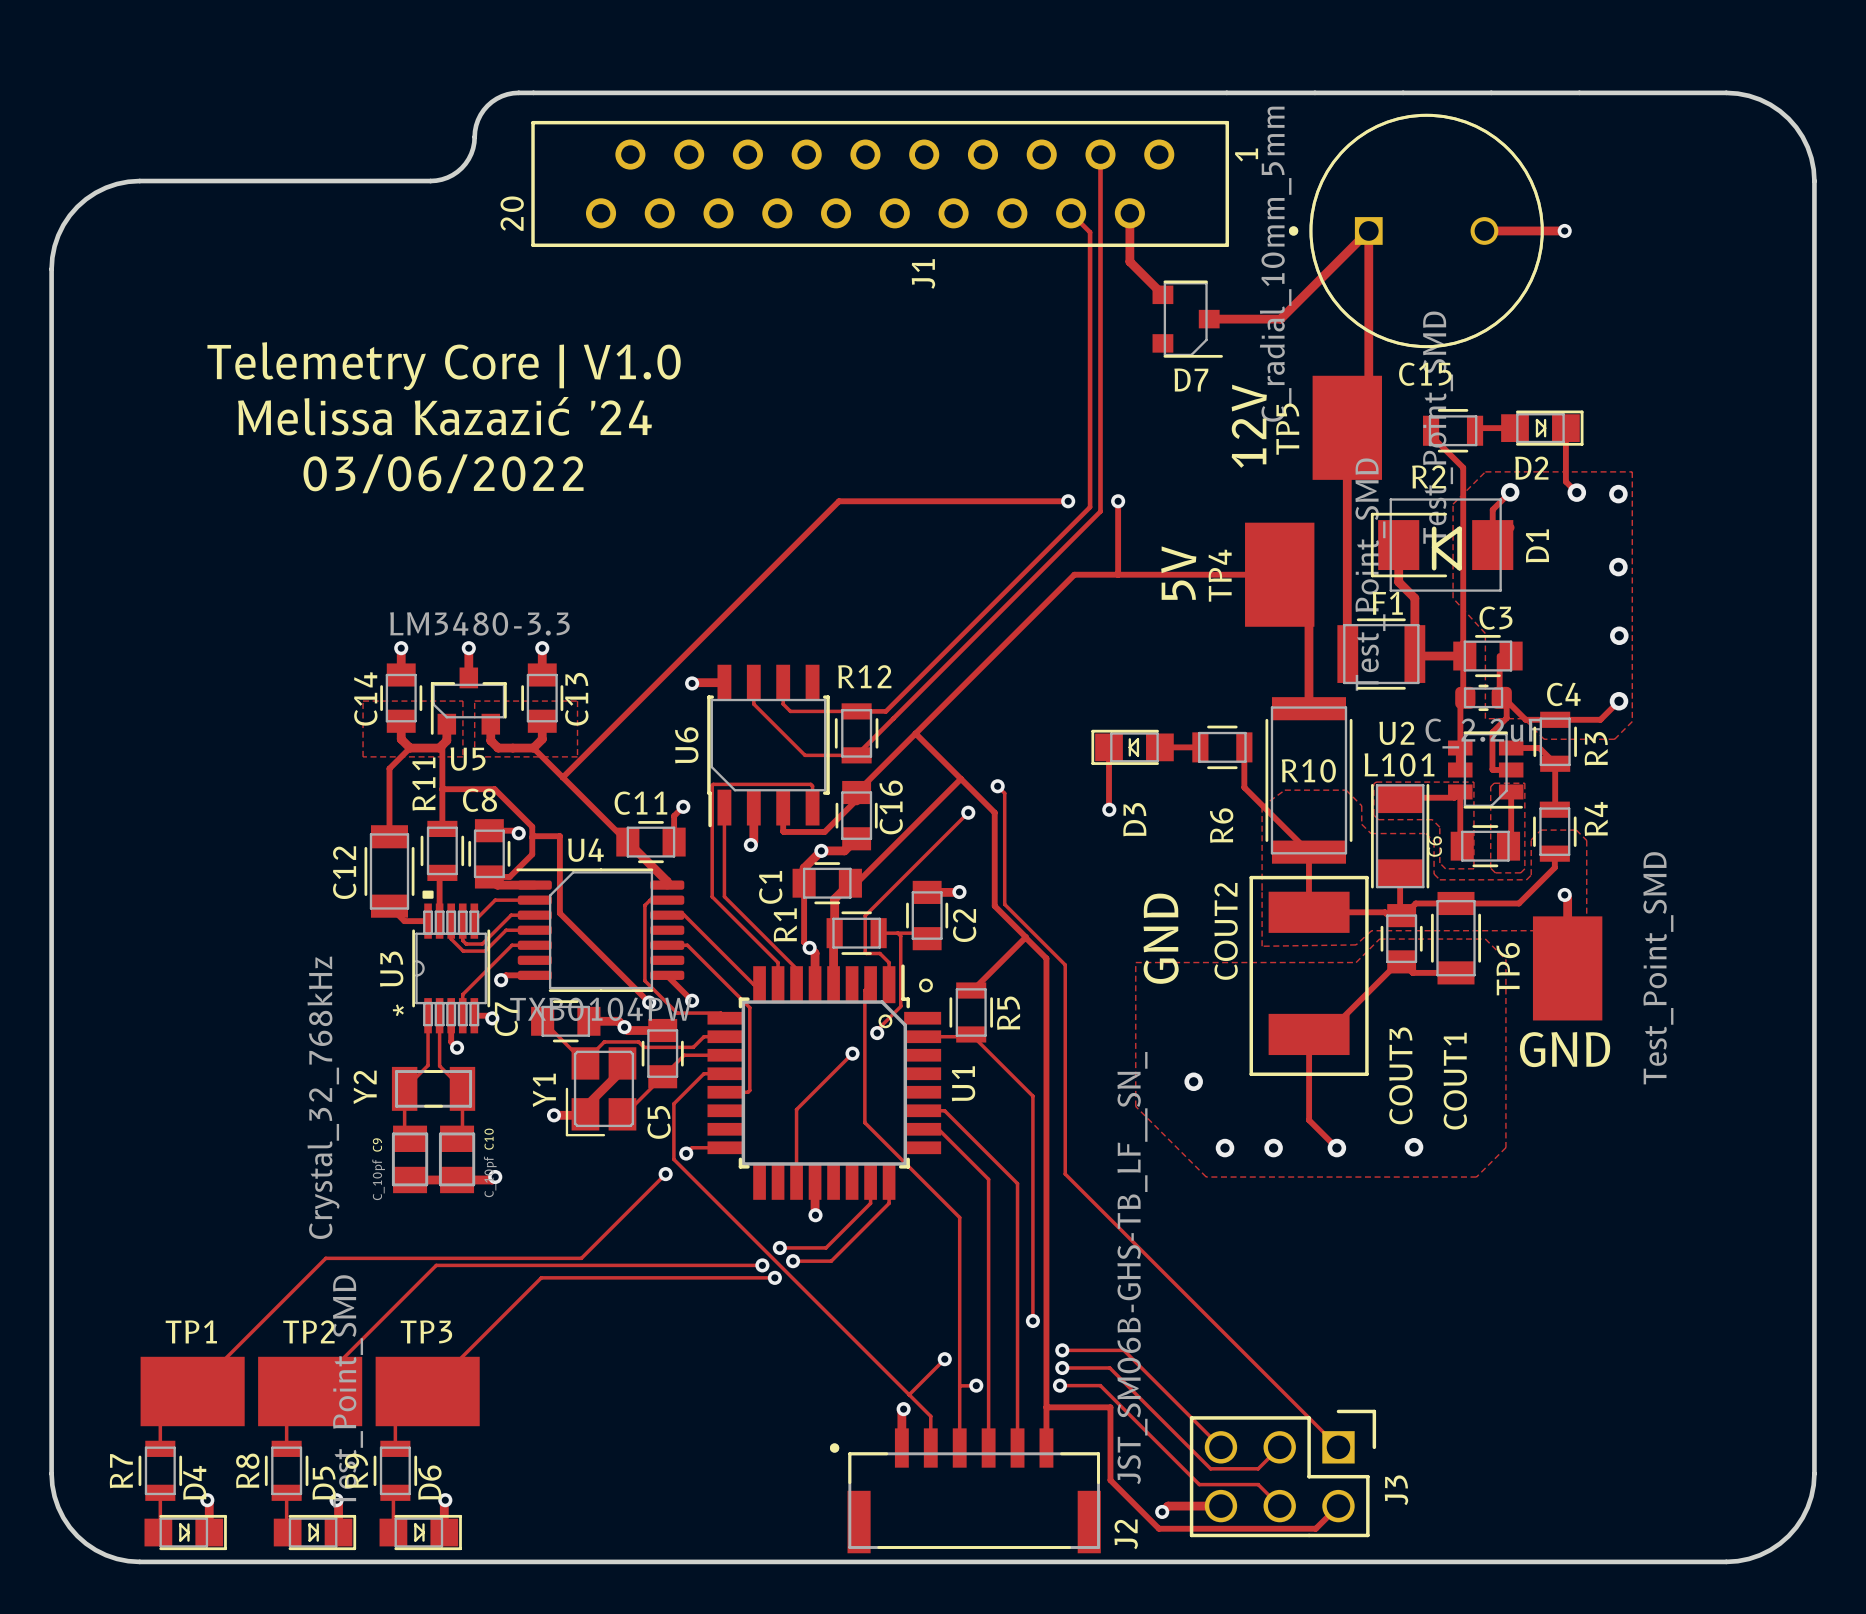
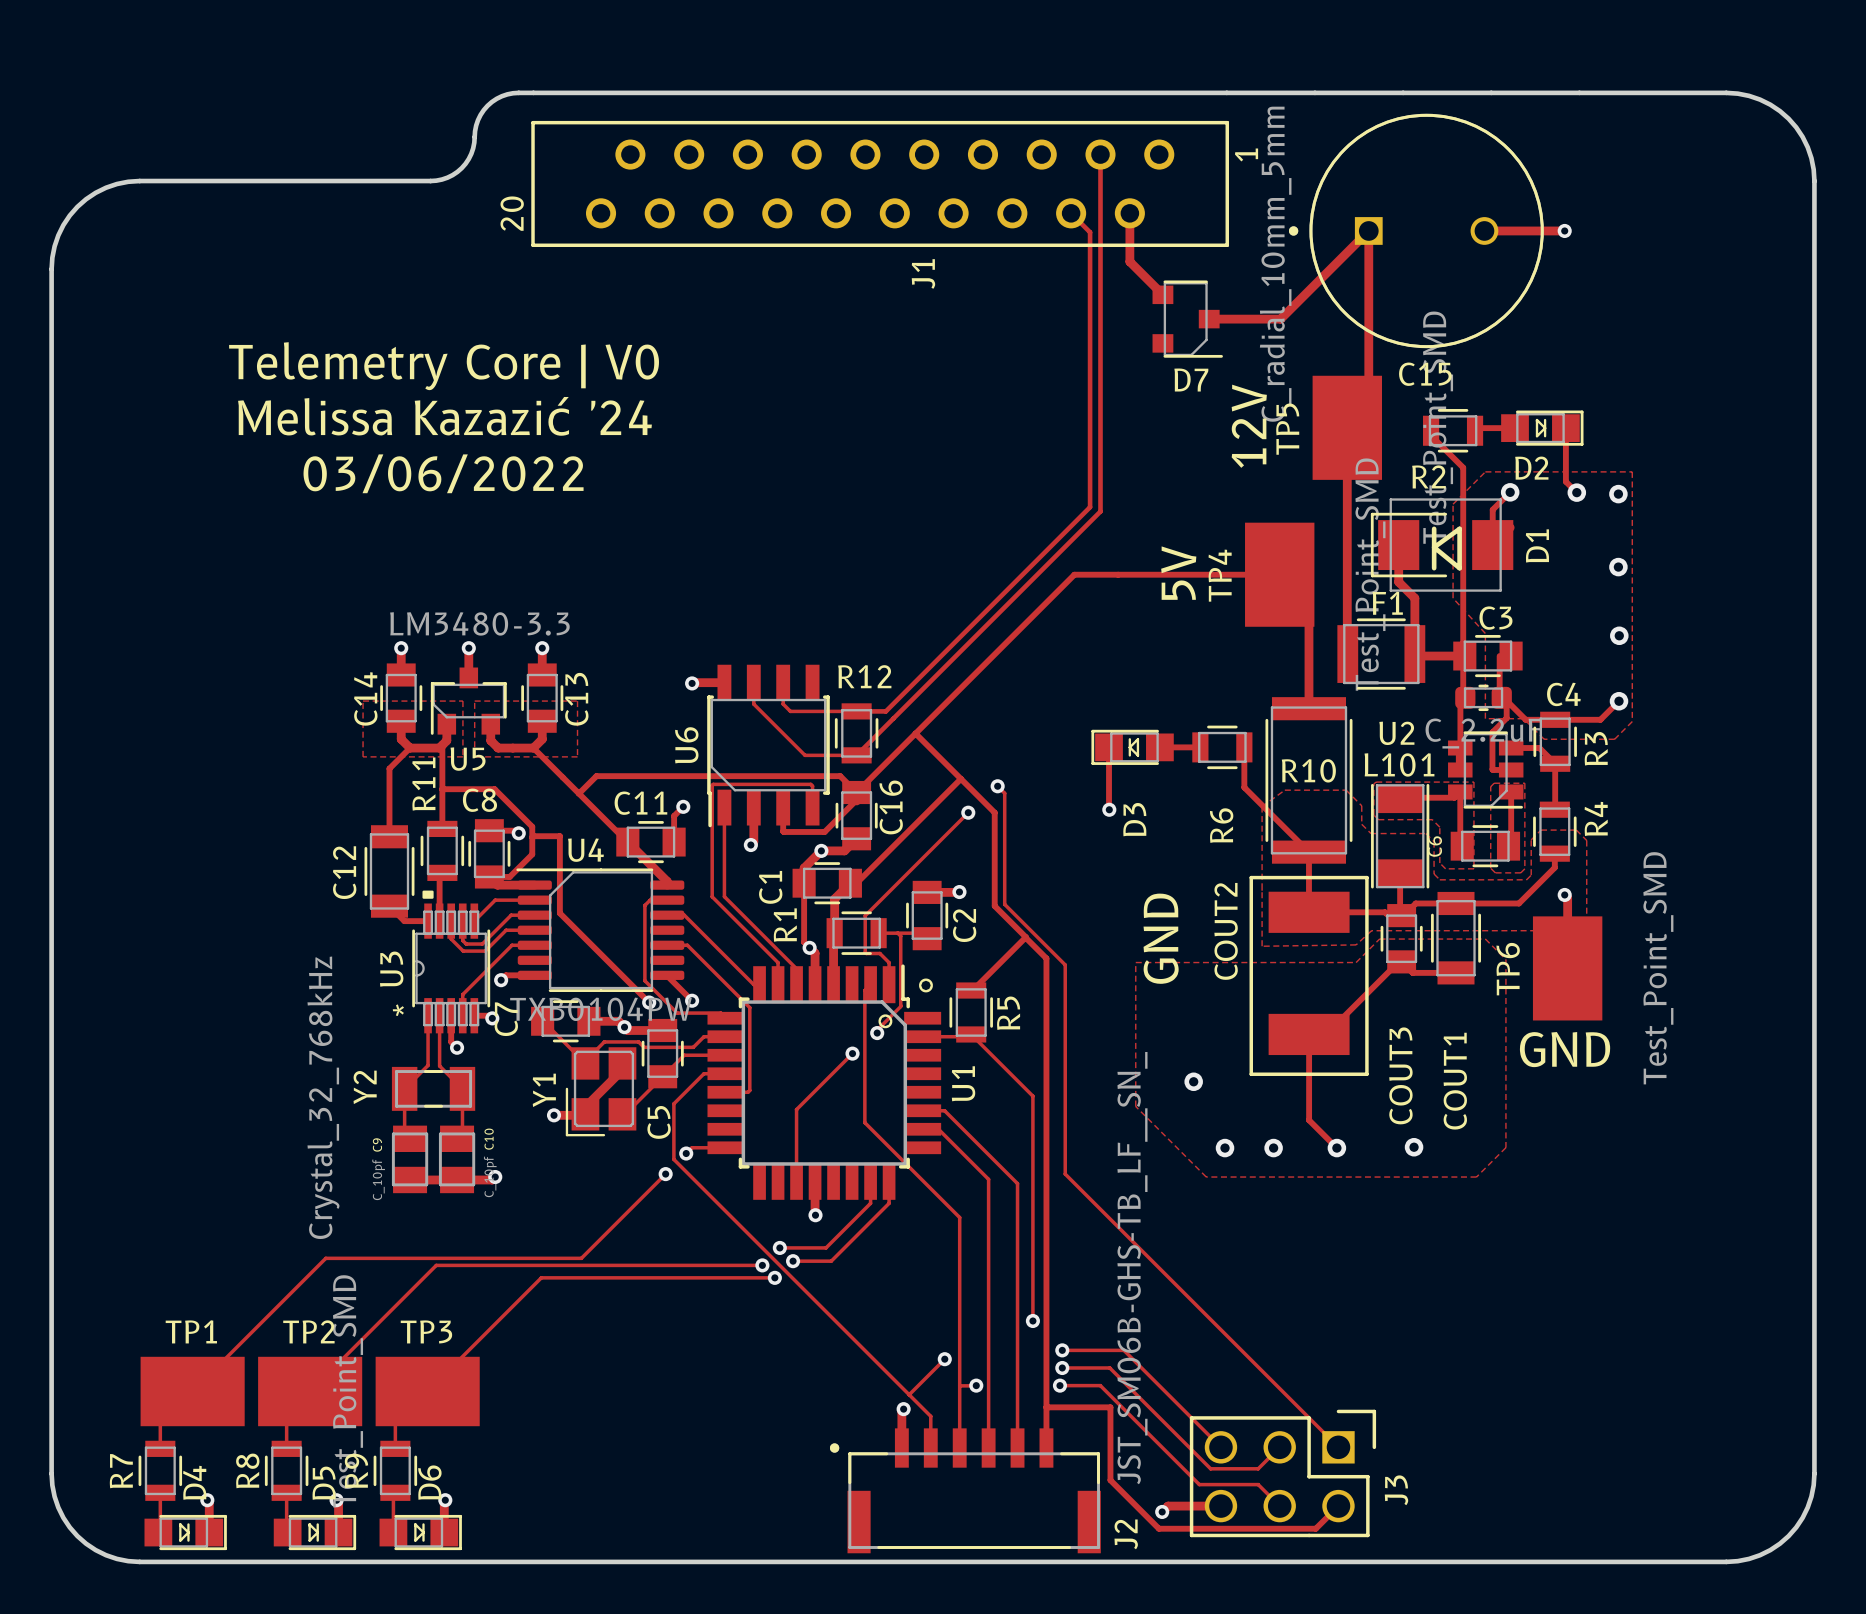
text: Telemetry Core | V1.0 (444, 366) -> Telemetry Core | V0 (444, 366)
track: (1068, 501) (839, 501) (562, 777) -> none
via: (1068, 501) -> none
track: (1118, 501) (1118, 574) -> none
via: (1118, 501) -> none
track: none -> (856, 792) (840, 776) (596, 776) (578, 793)

